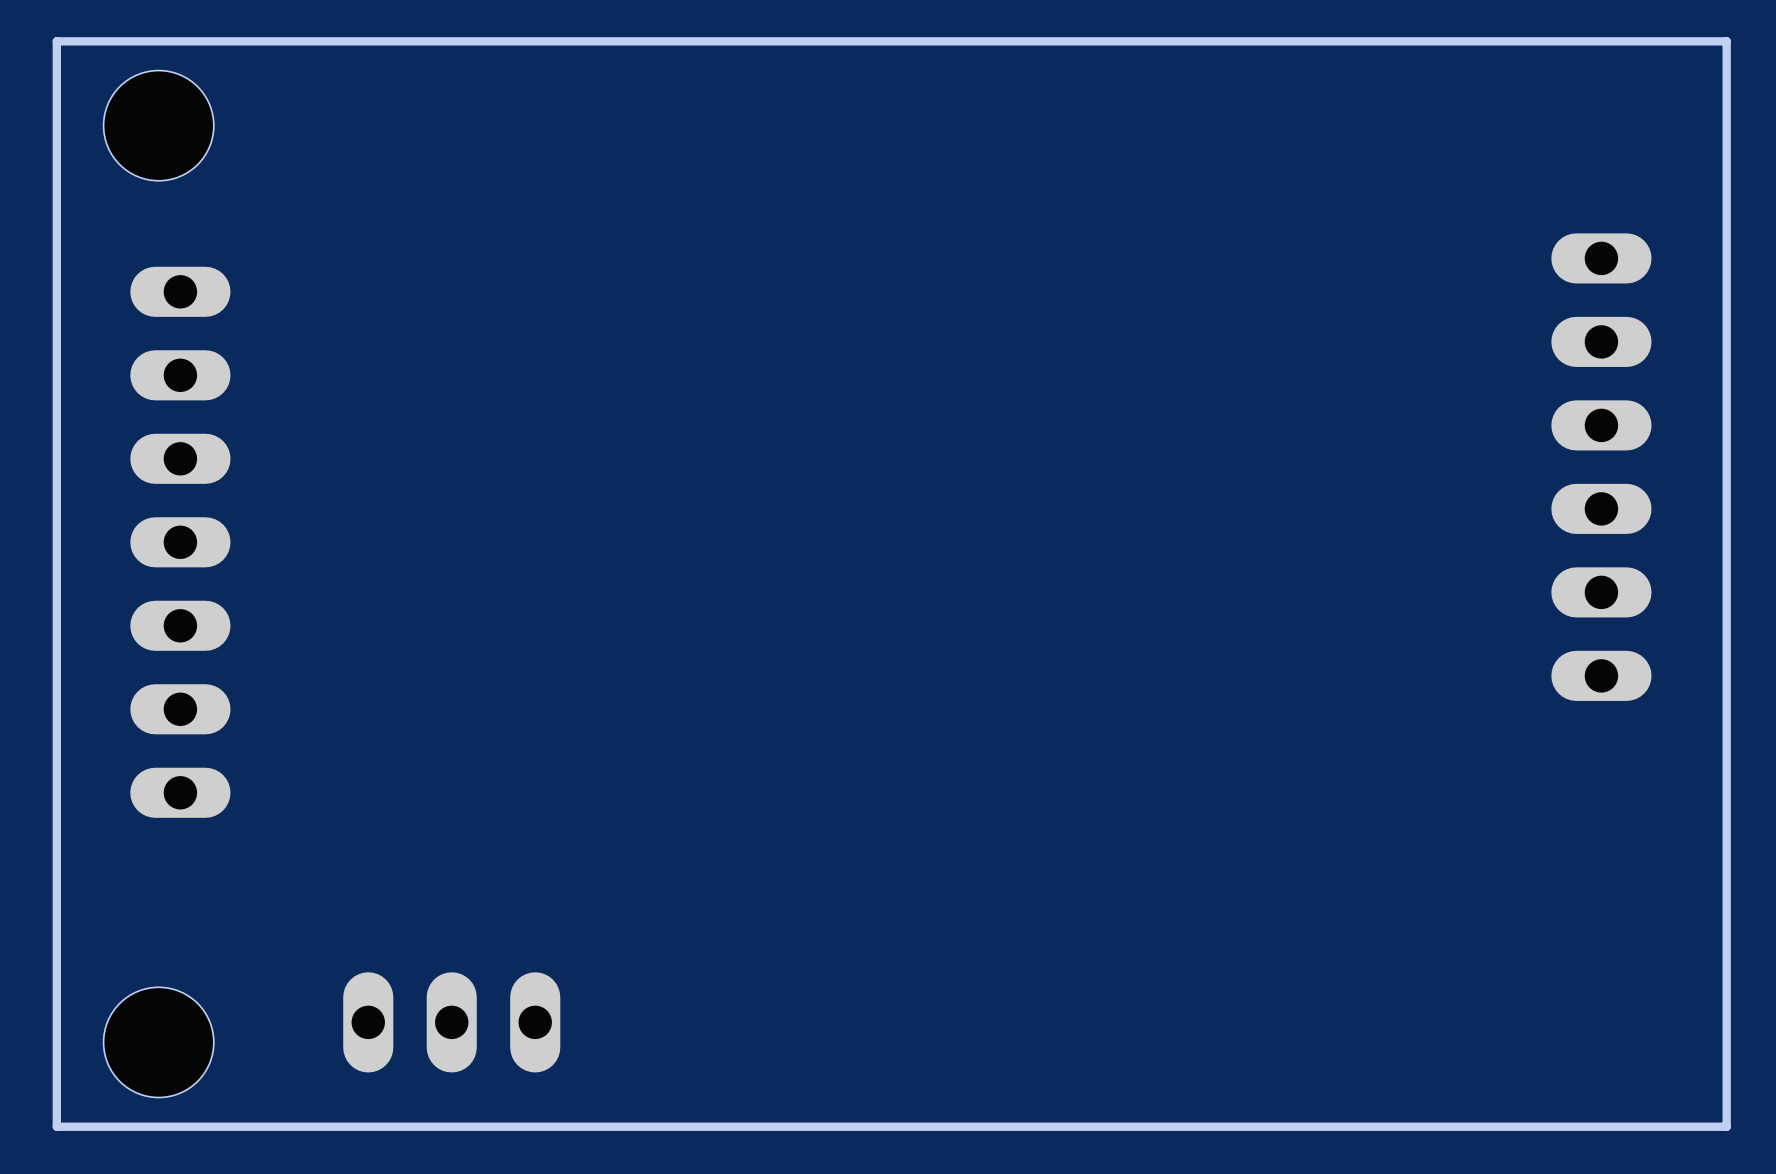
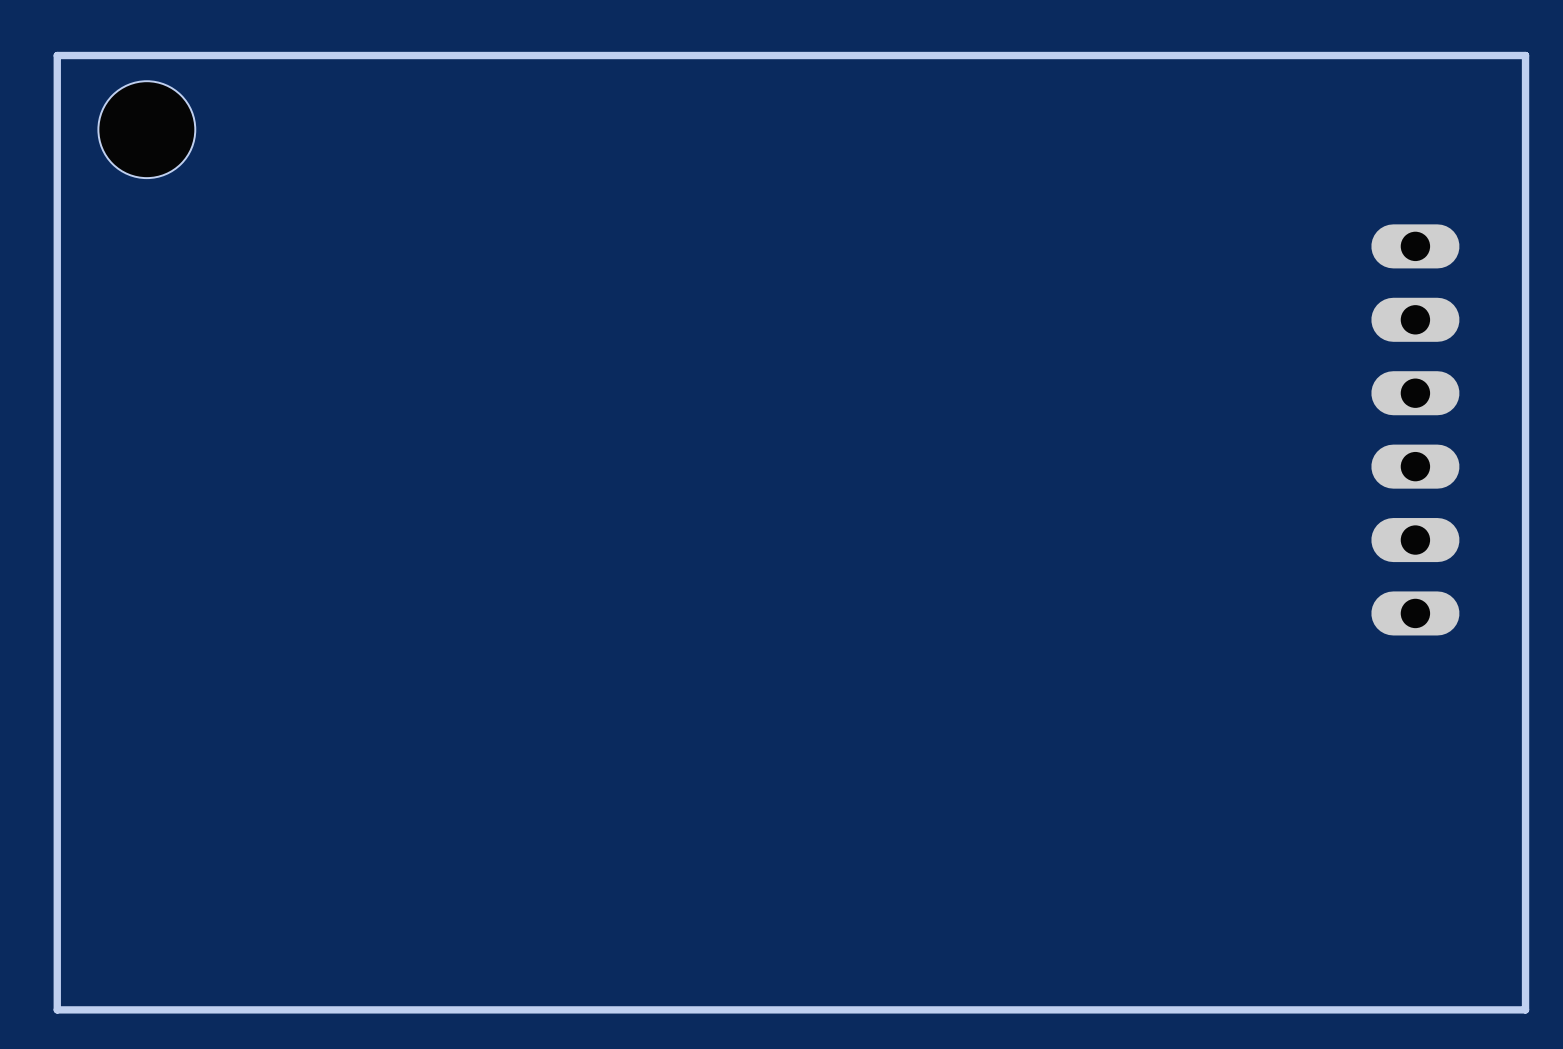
part: (180, 542) -> none
part: (451, 1022) -> none
hole: (158, 1042) -> none

